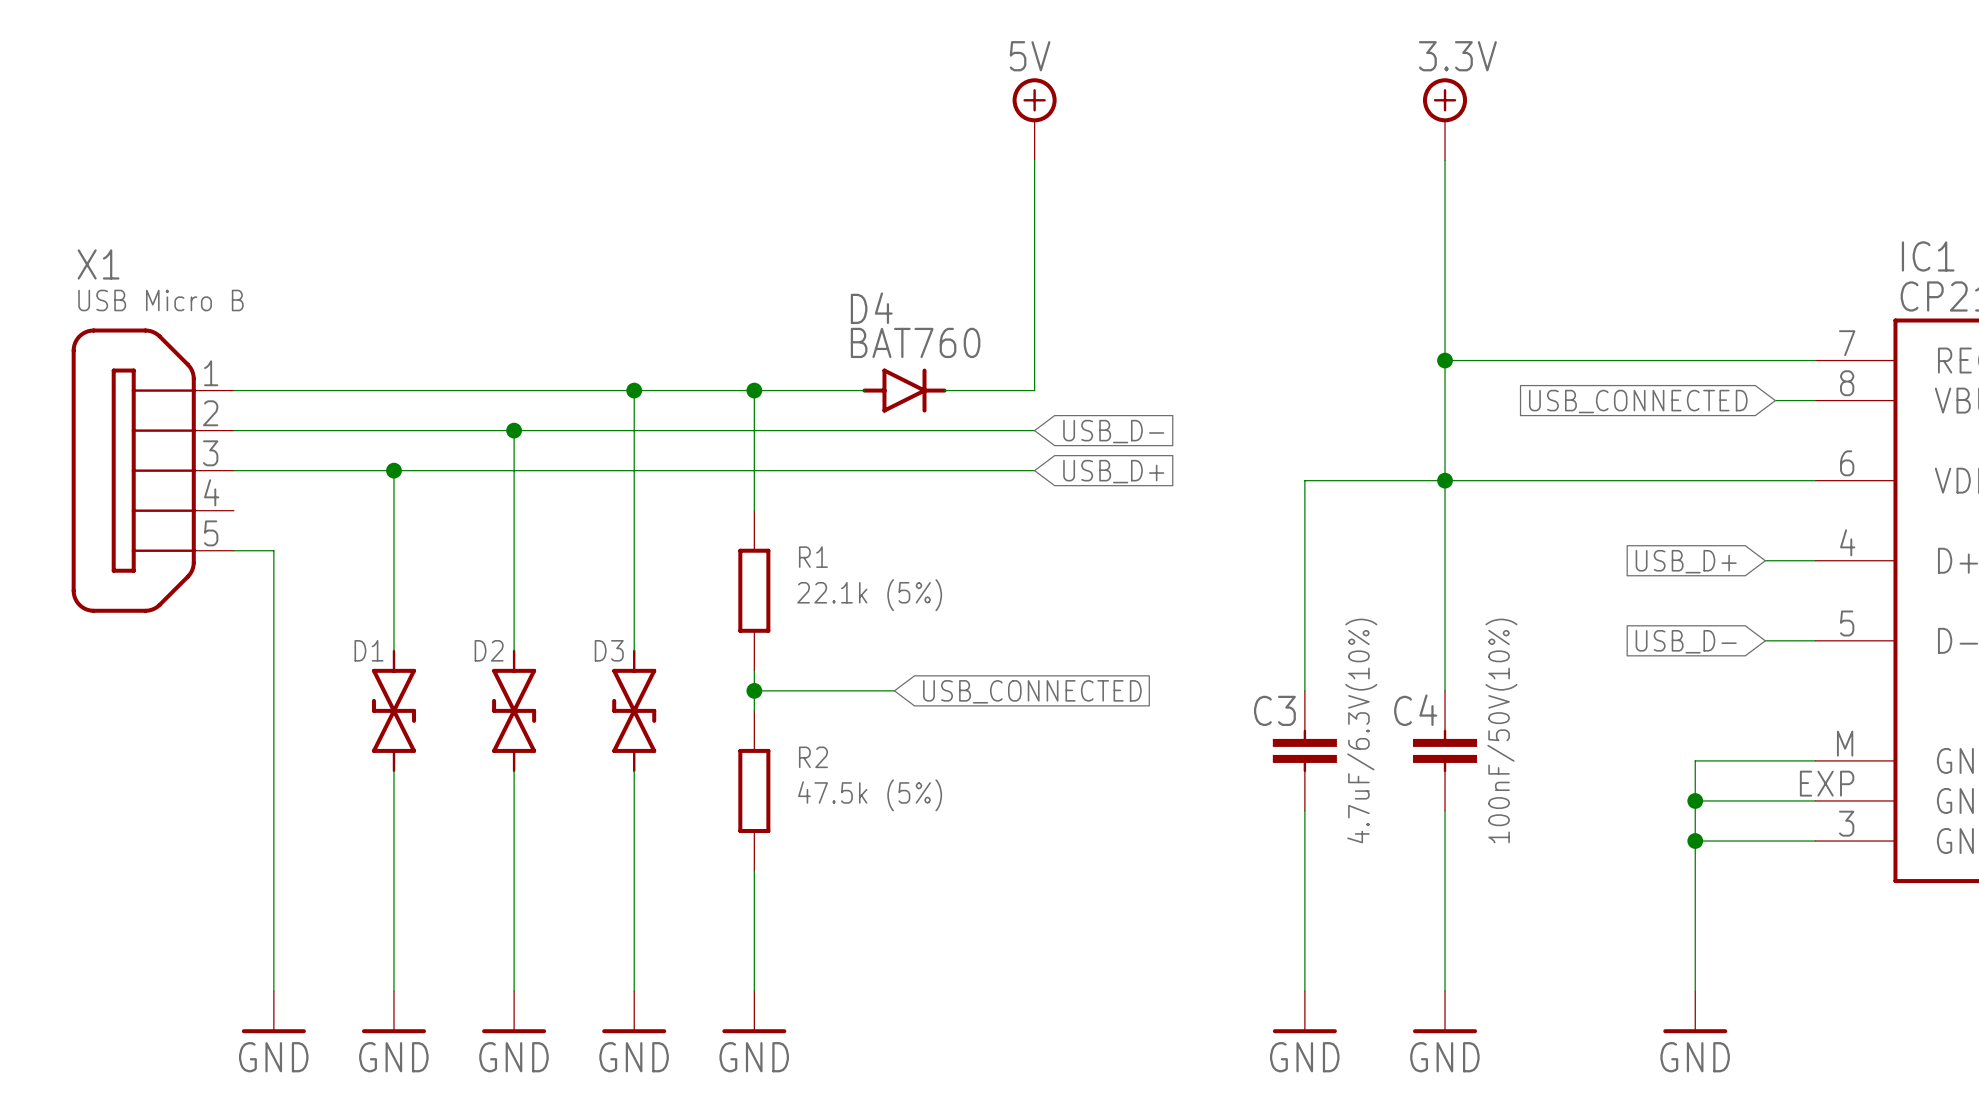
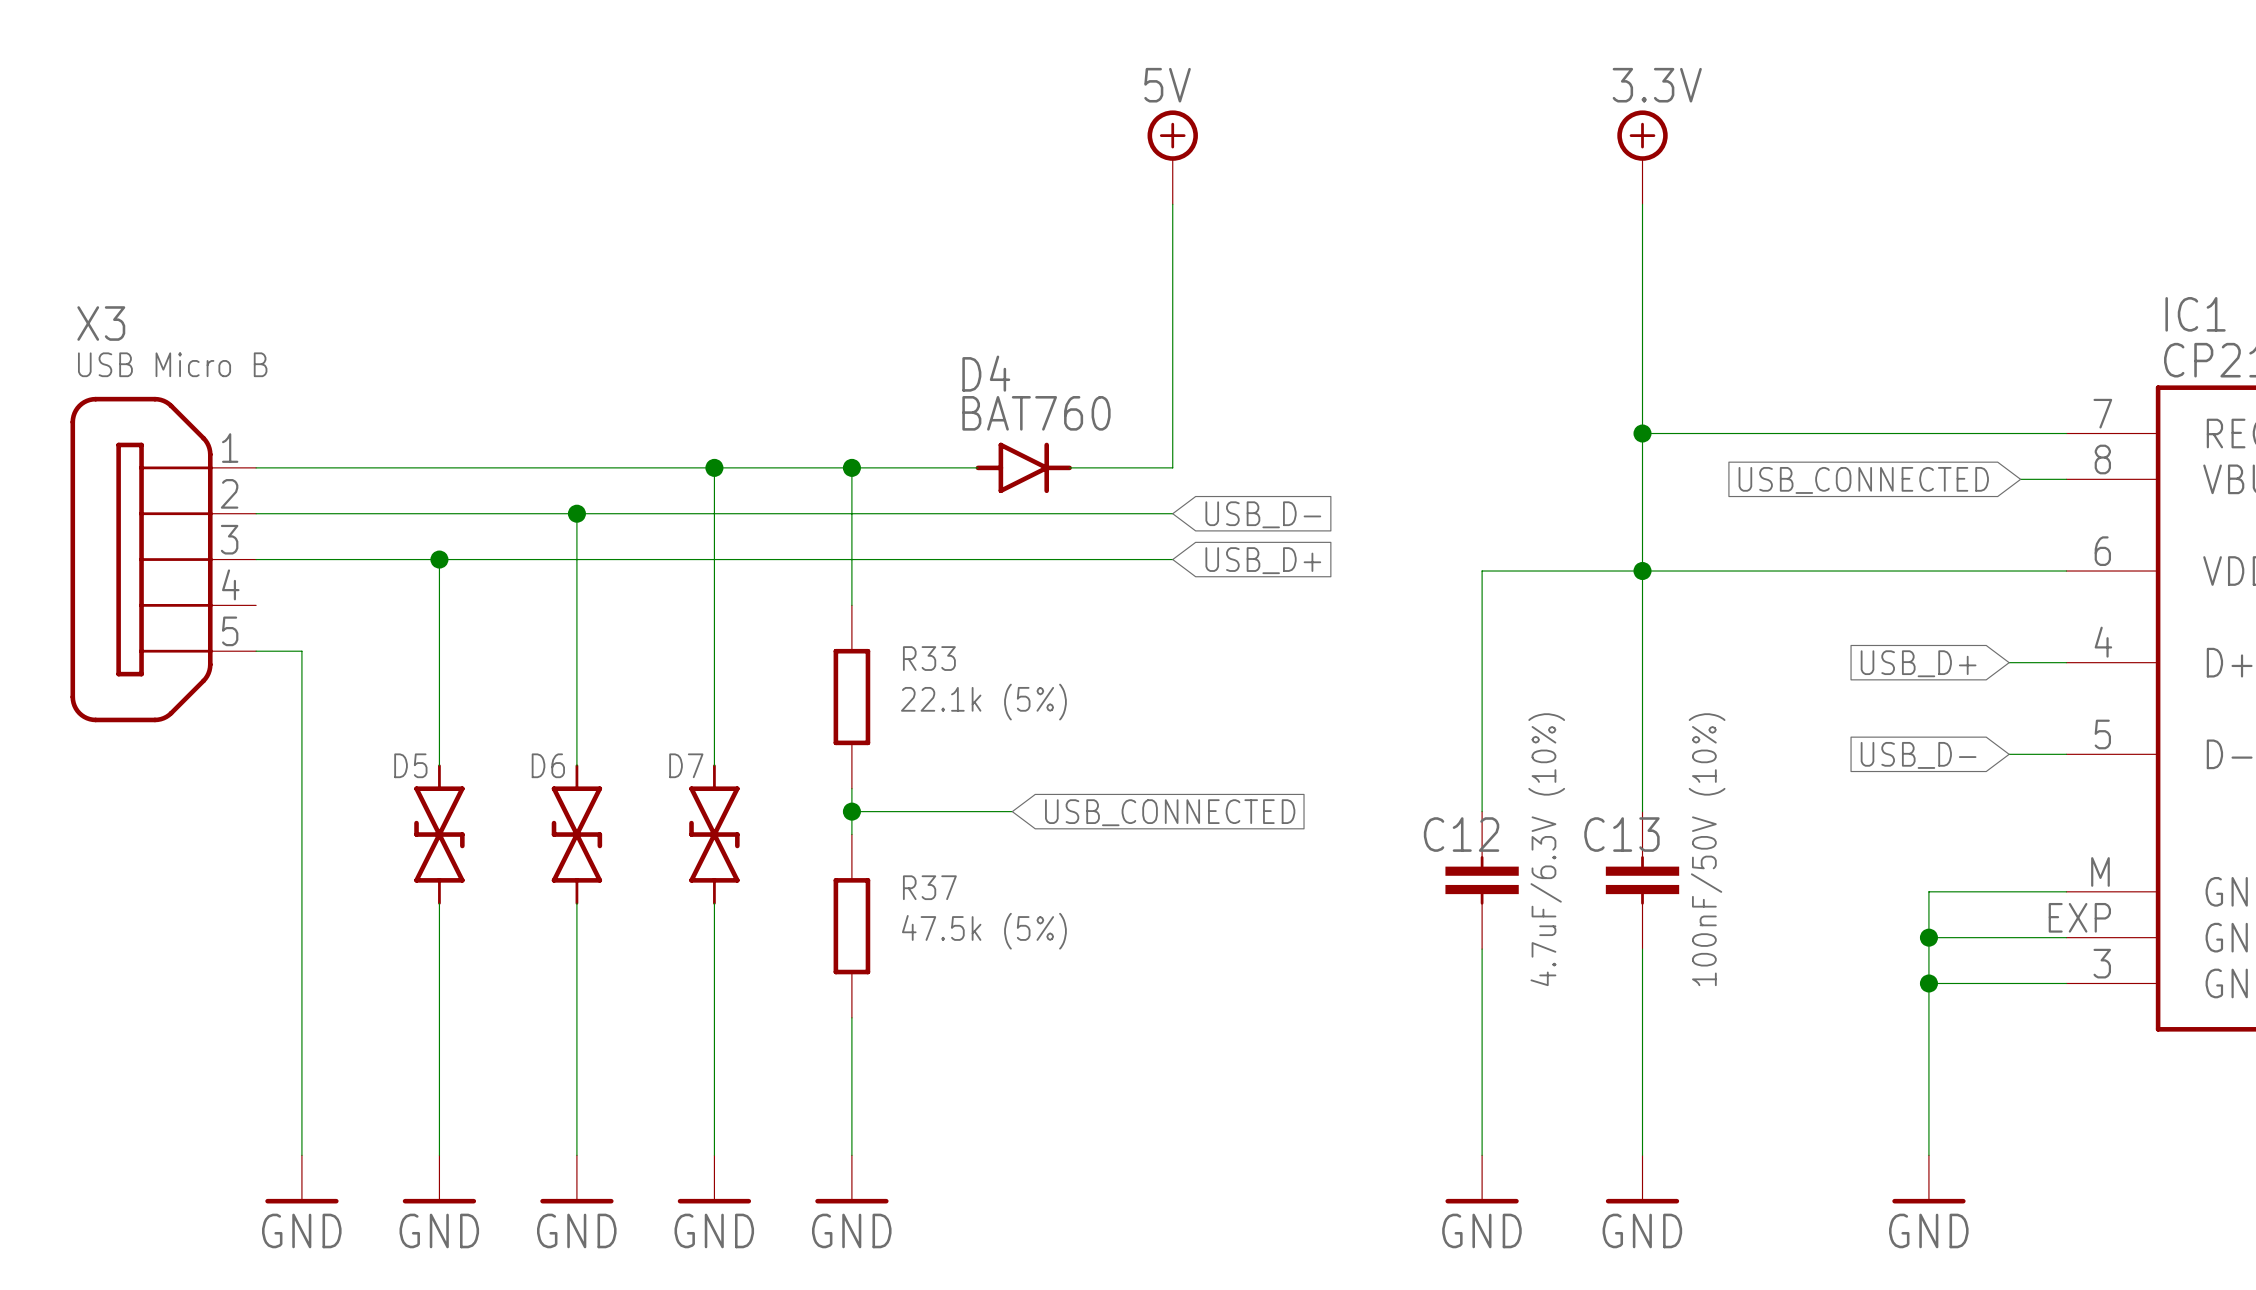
X1 name: X1 (98, 264) -> X3 (101, 323)
R1 name: R1 (813, 557) -> R33 (929, 658)
D1 name: D1 (369, 650) -> D5 (410, 765)
D2 name: D2 (489, 650) -> D6 (548, 765)
D3 name: D3 (609, 650) -> D7 (686, 765)
C3 name: C3 (1274, 710) -> C12 (1461, 834)
C4 name: C4 (1415, 710) -> C13 (1621, 834)
C3 value: 4.7uF/6.3V(10%) (1361, 730) -> 4.7uF/6.3V (10%) (1546, 849)
C4 value: 100nF/50V(10%) (1501, 730) -> 100nF/50V (10%) (1707, 849)
R2 name: R2 (813, 757) -> R37 (929, 887)

